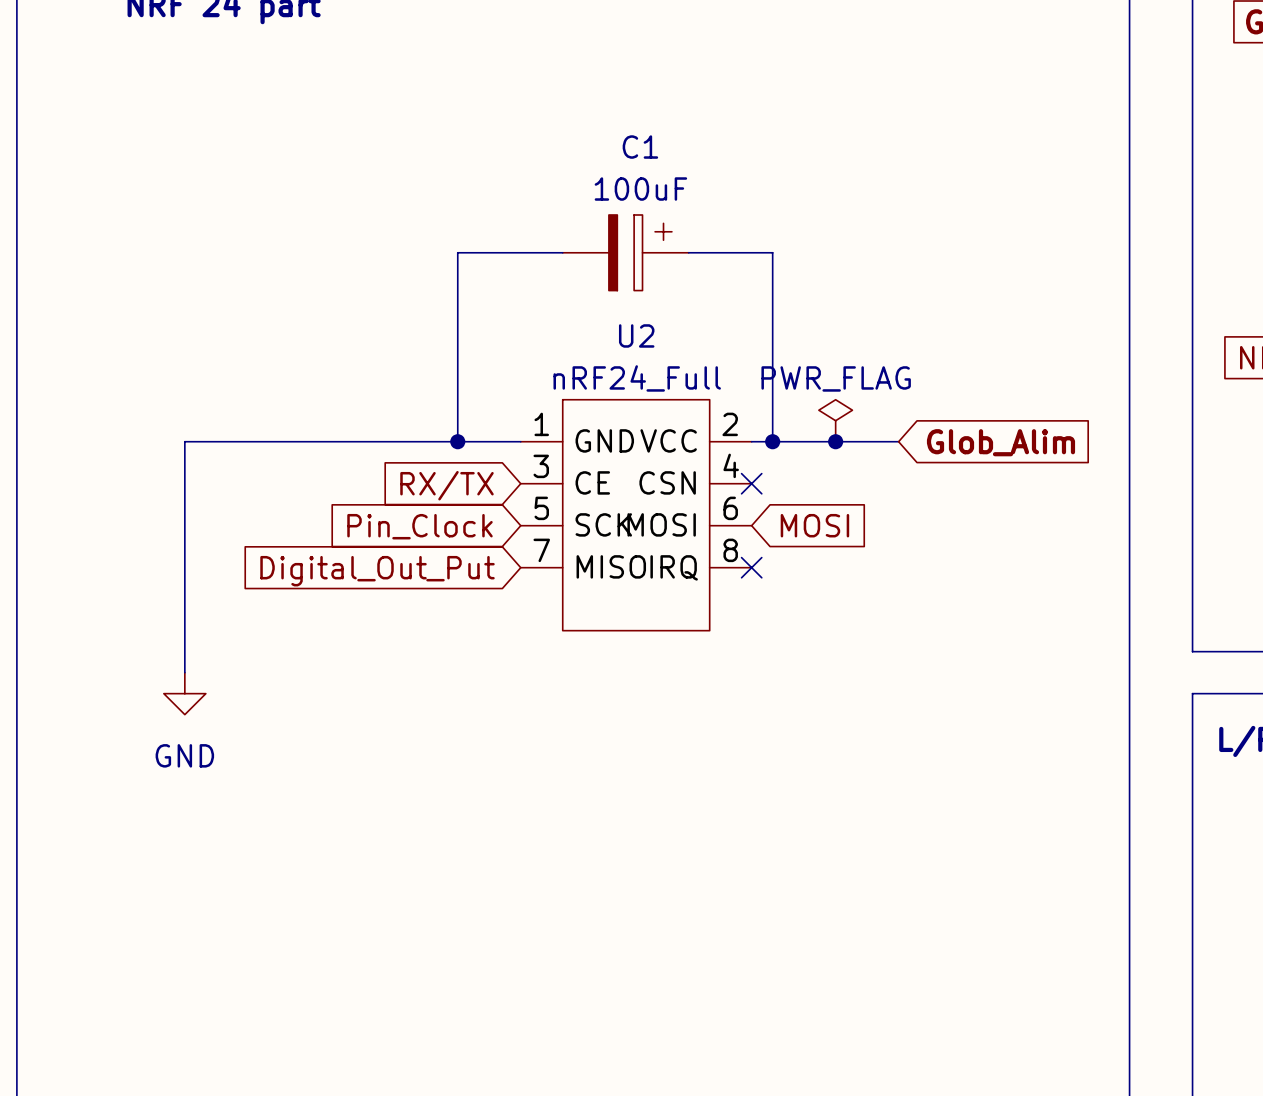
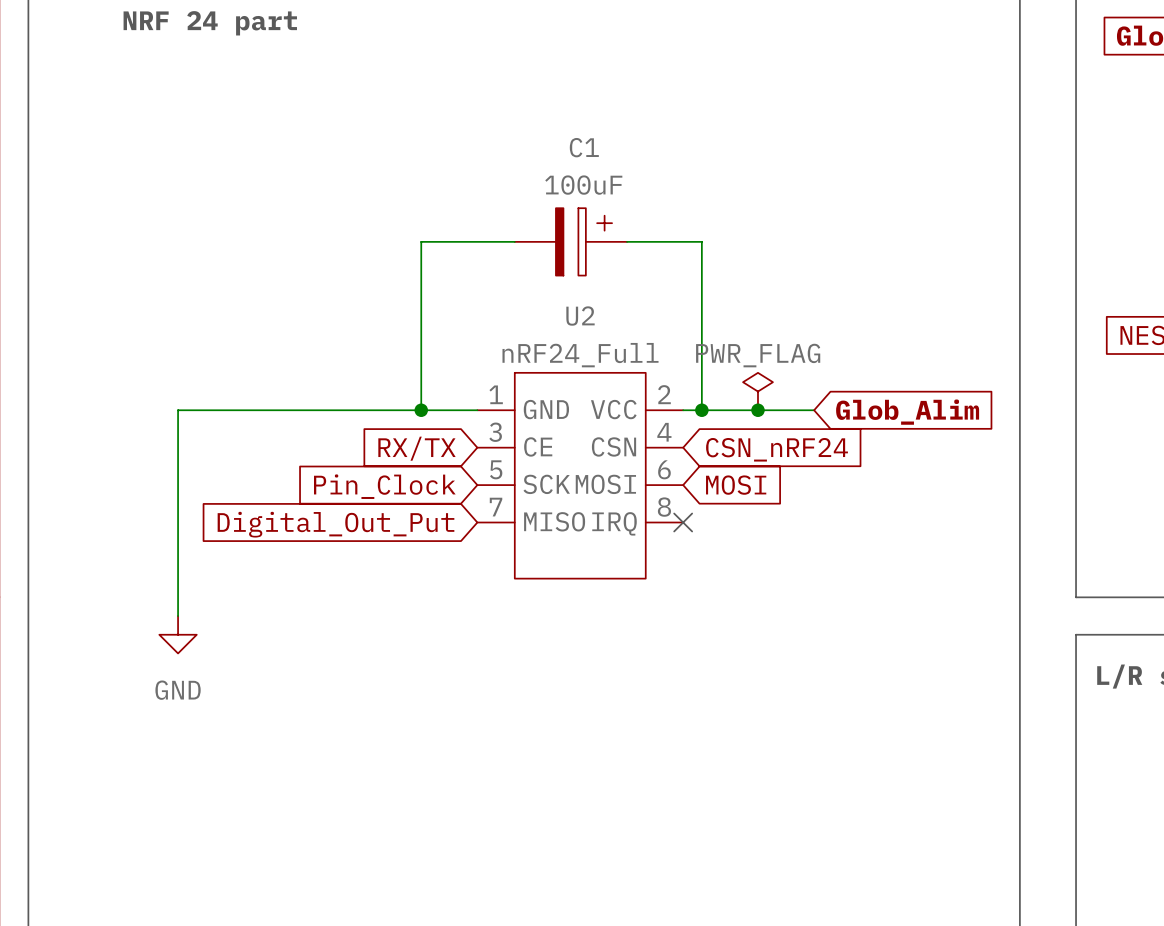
no-connect mark: (751, 483) -> none
global label: none -> CSN_nRF24 (777, 449)

